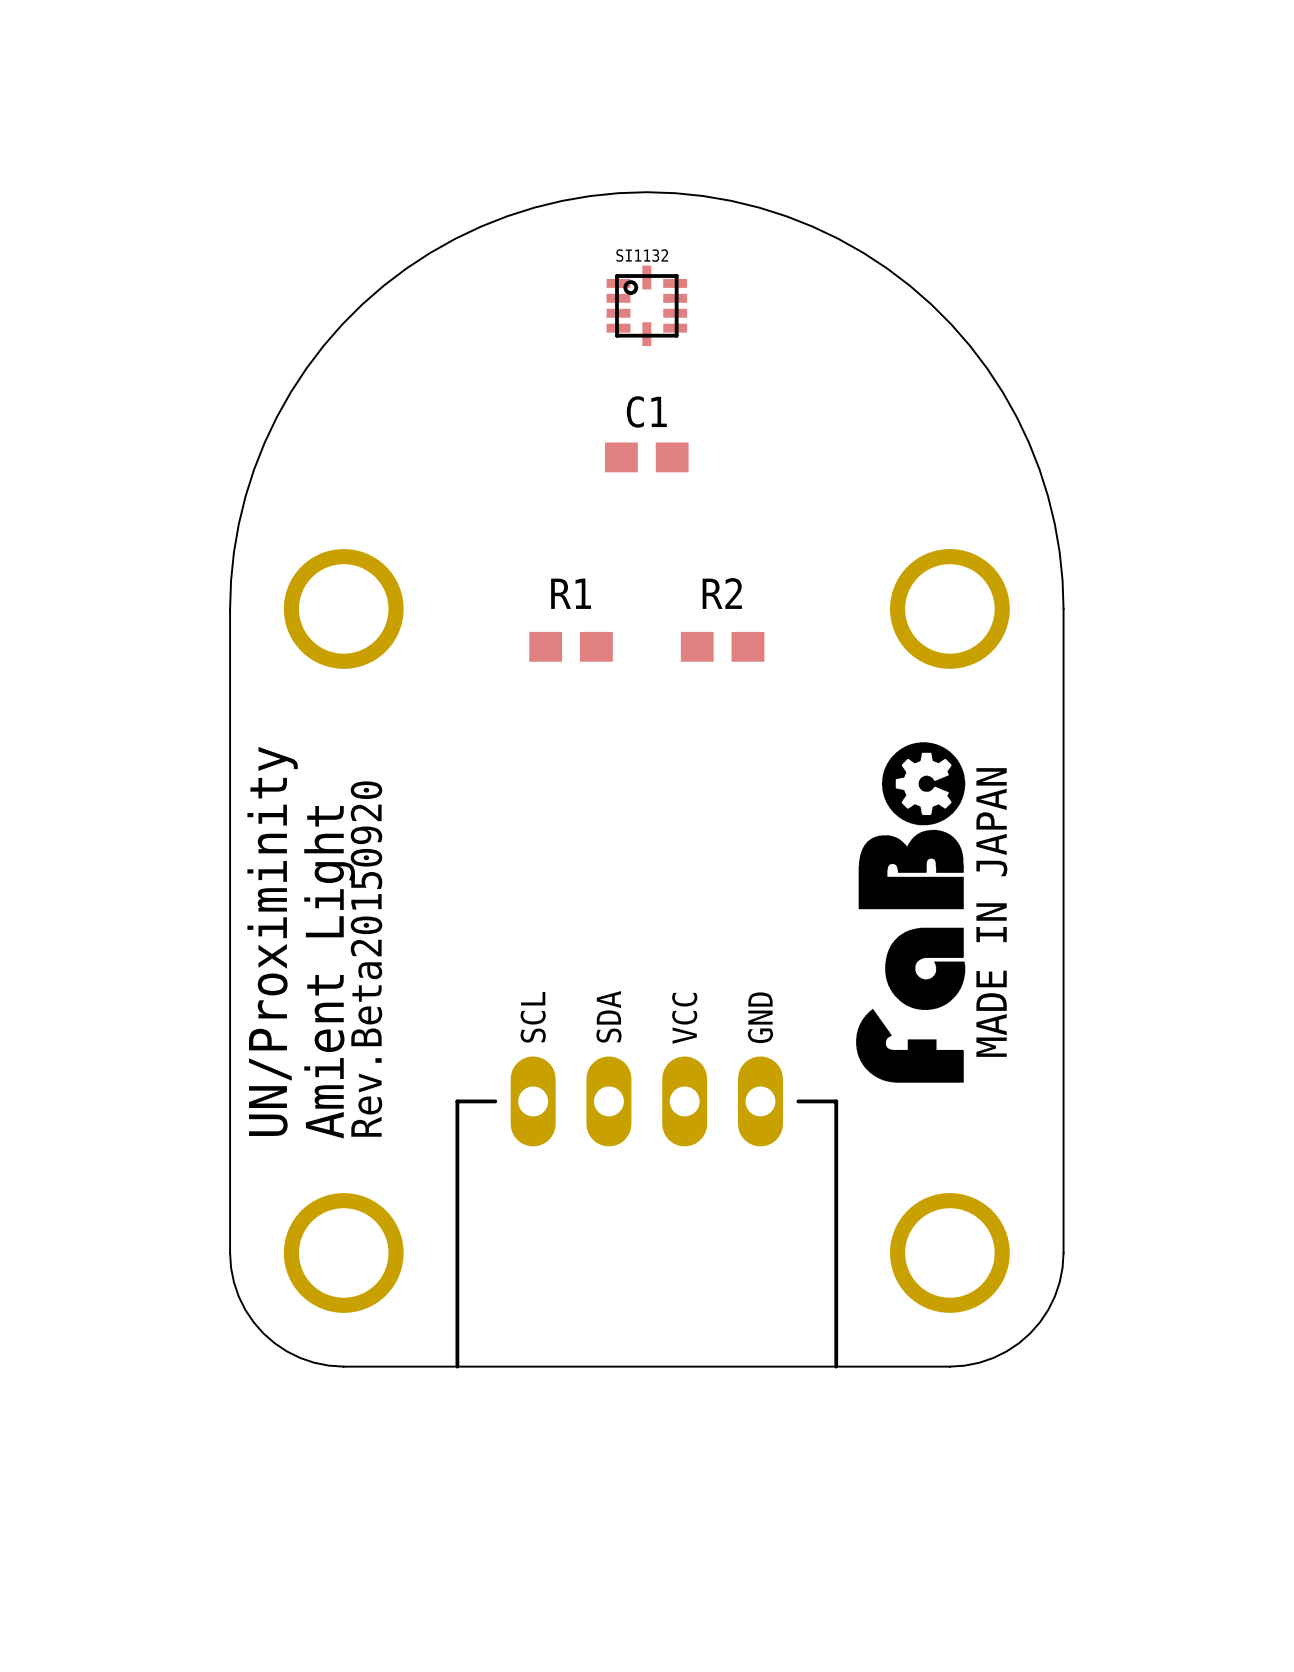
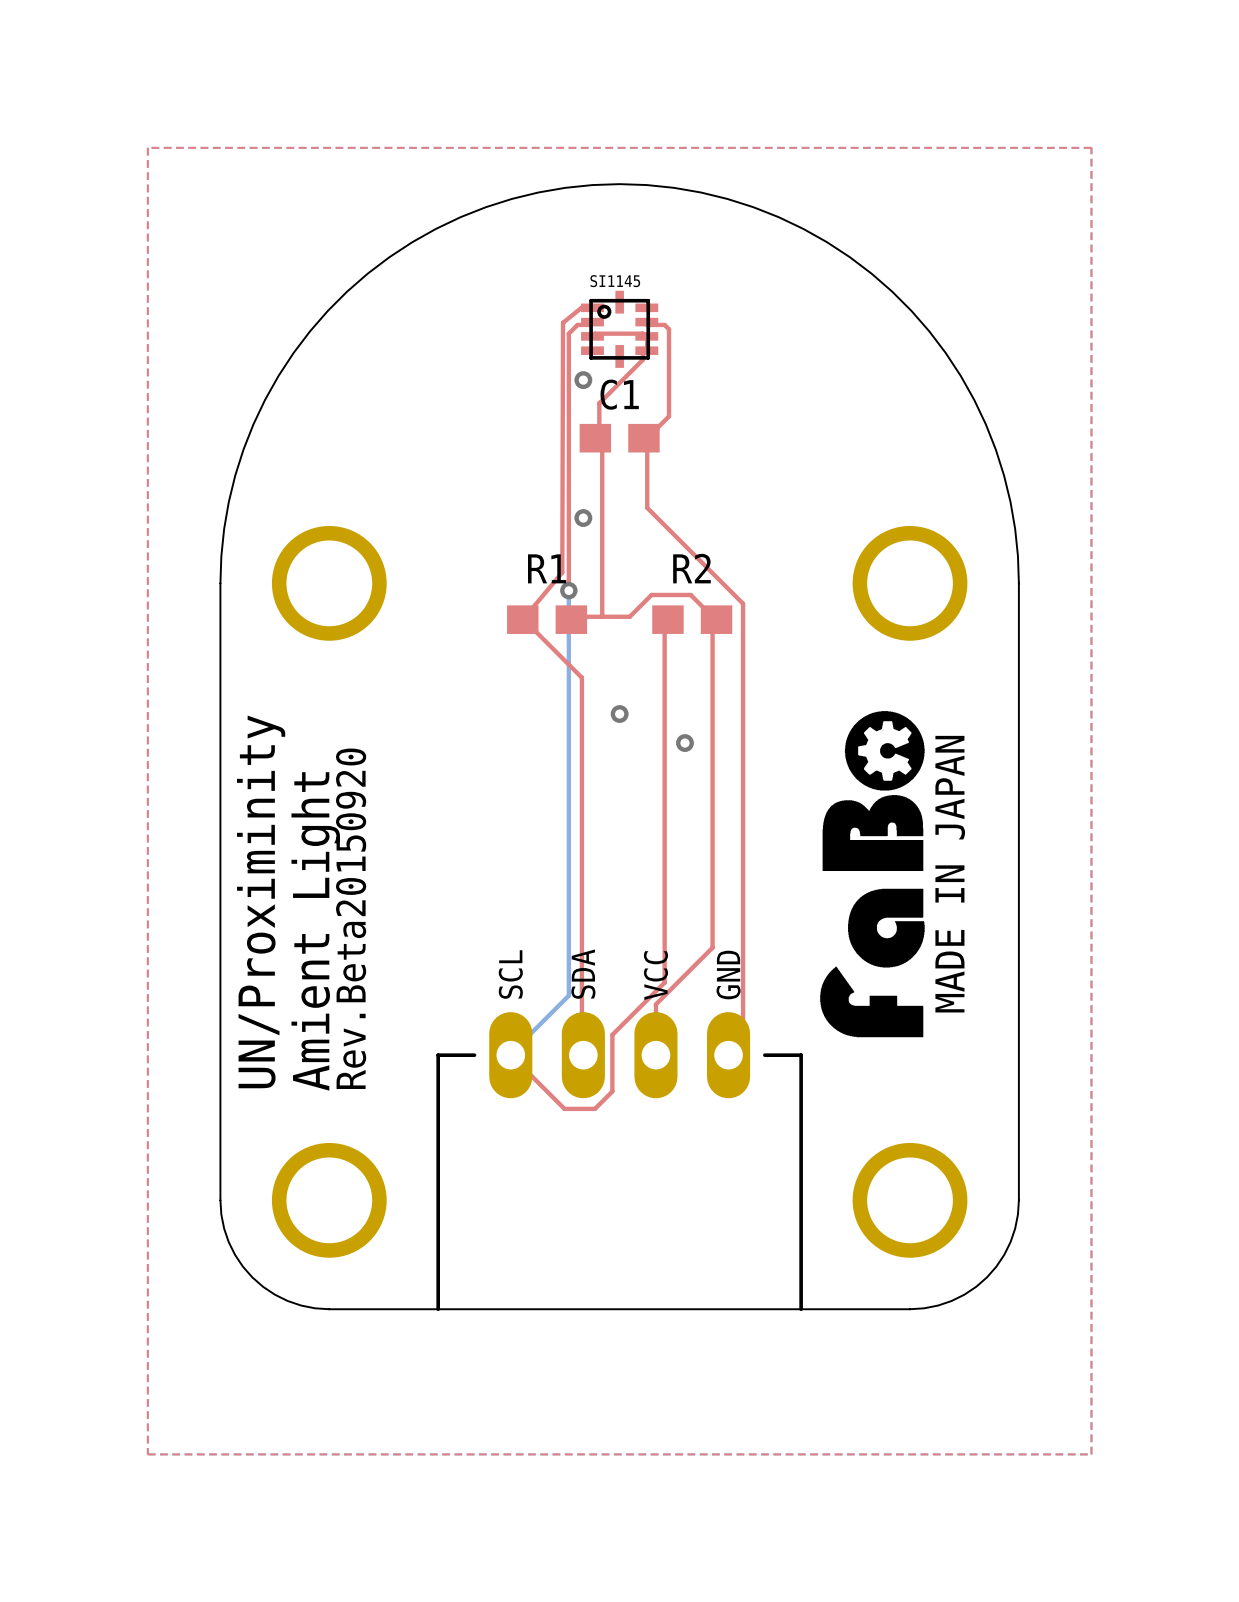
top zone outline: none -> (147, 147) (1091, 147) (1091, 1454) (147, 1454) (147, 147)
SI1132: (646, 305) -> none
top track: none -> (592, 307) (581, 307) (563, 322) (562, 572) (522, 619) (581, 677) (583, 1055)
top track: none -> (592, 322) (590, 324) (577, 324) (568, 333) (568, 590)
top track: none -> (646, 322) (647, 324) (664, 324) (669, 329) (669, 416) (647, 438)
SI1145: none -> (619, 329)
top track: none -> (592, 336) (594, 333) (642, 333) (647, 338) (646, 350) (642, 351) (642, 359) (599, 403) (599, 438)
via: none -> (583, 380)
top track: none -> (595, 438) (602, 438) (602, 616)
top track: none -> (647, 438) (647, 507) (743, 603) (743, 1039) (728, 1055)
via: none -> (583, 518)
bottom track: none -> (568, 590) (568, 995) (510, 1055)
via: none -> (568, 590)
top track: none -> (571, 619) (573, 616) (629, 616) (651, 594) (690, 594) (716, 619) (712, 621) (712, 947) (655, 1004) (655, 1055)
top track: none -> (667, 619) (664, 621) (664, 982) (612, 1034) (612, 1091) (594, 1108) (564, 1108) (510, 1055)
via: none -> (619, 714)
via: none -> (684, 743)

